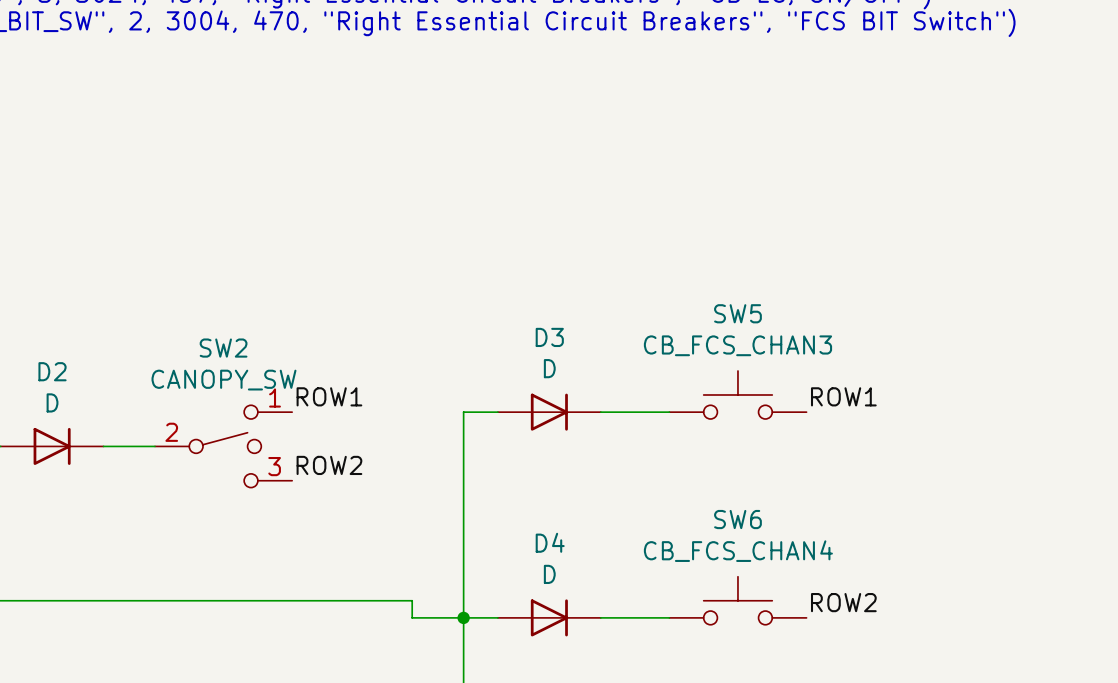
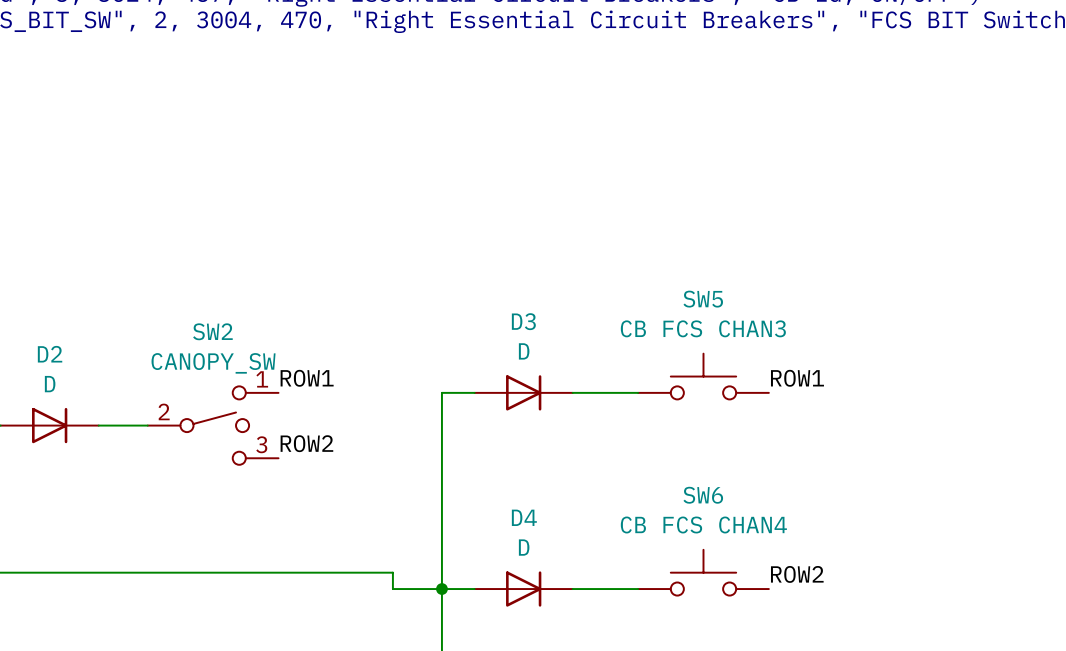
SW5 value: CB_FCS_CHAN3 (737, 345) -> CB FCS CHAN3 (703, 328)
SW6 value: CB_FCS_CHAN4 (738, 551) -> CB FCS CHAN4 (703, 525)

